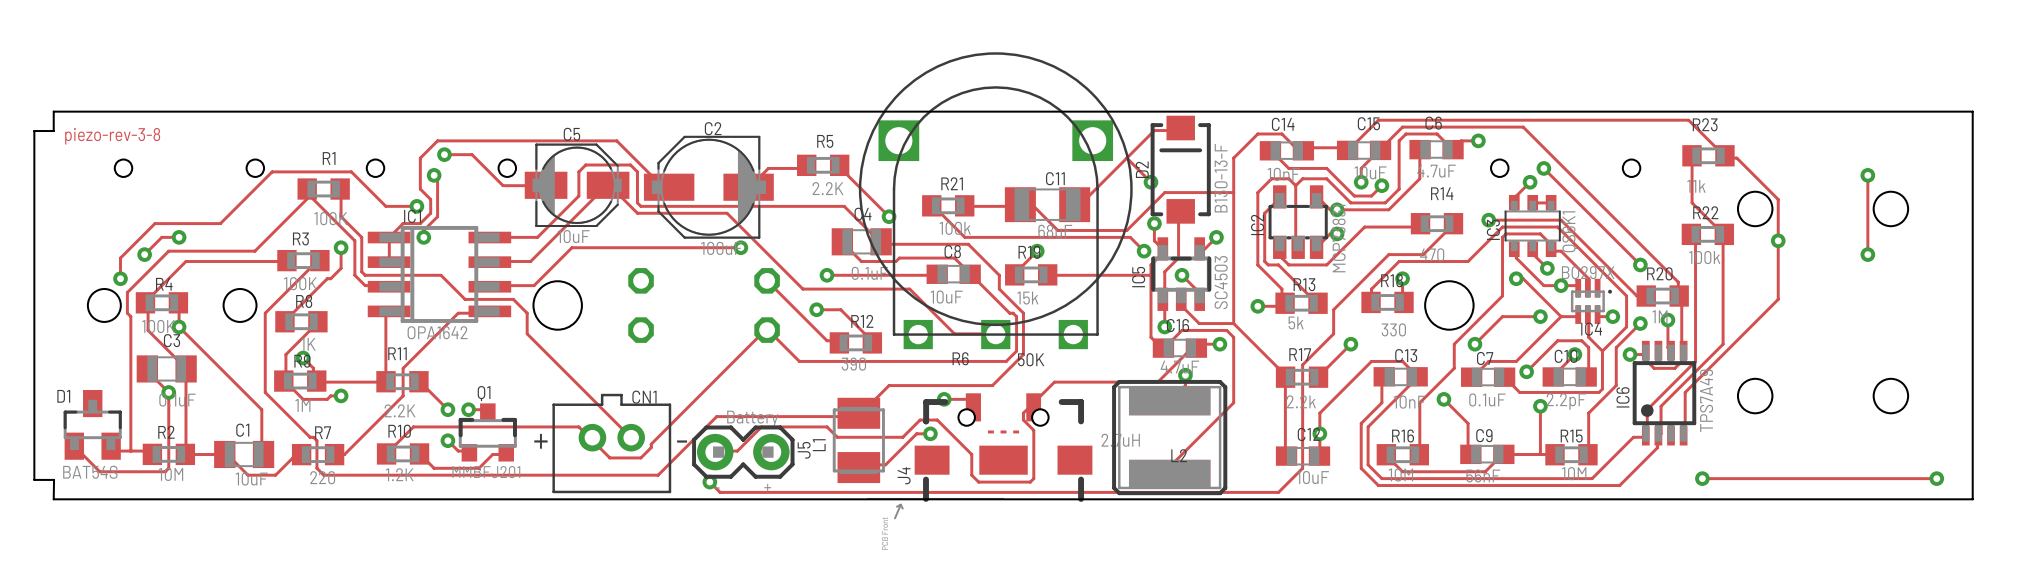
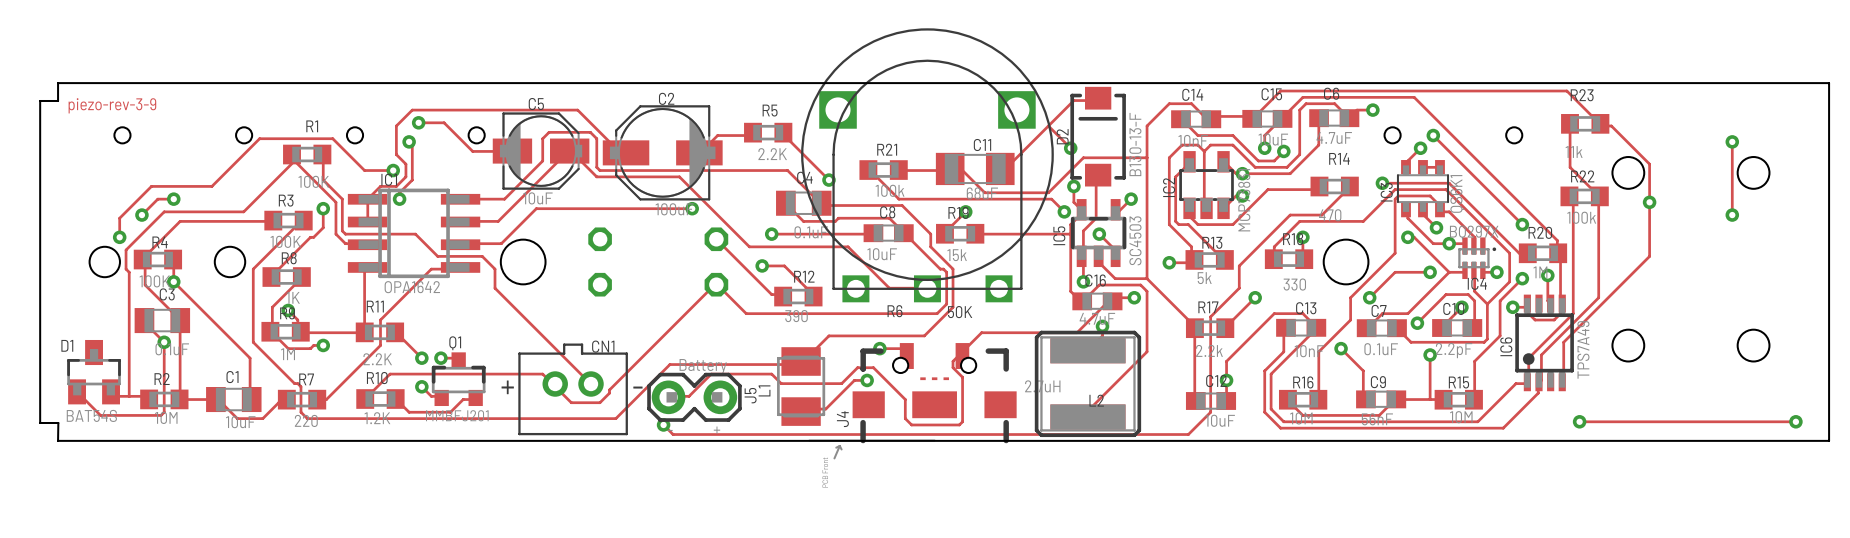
text: piezo-rev-3-8 (112, 136) -> piezo-rev-3-9 (112, 105)

